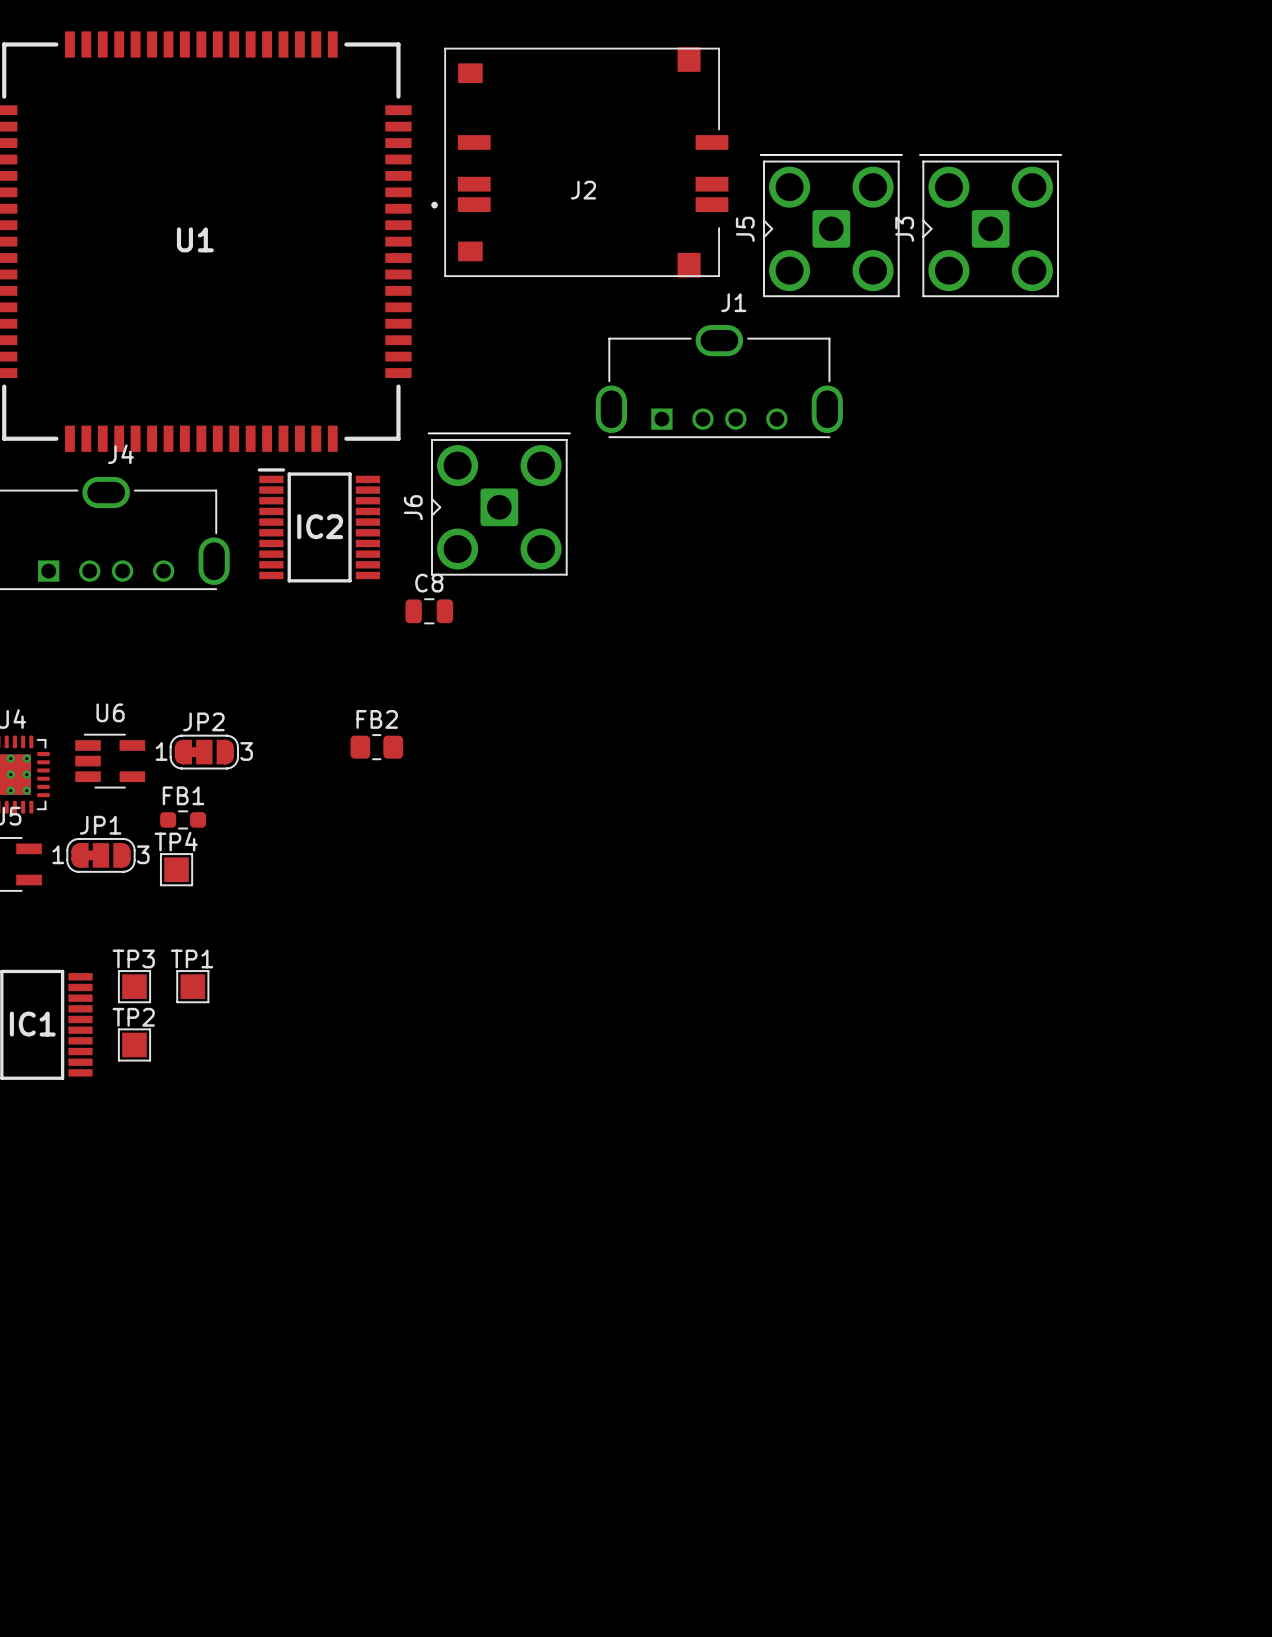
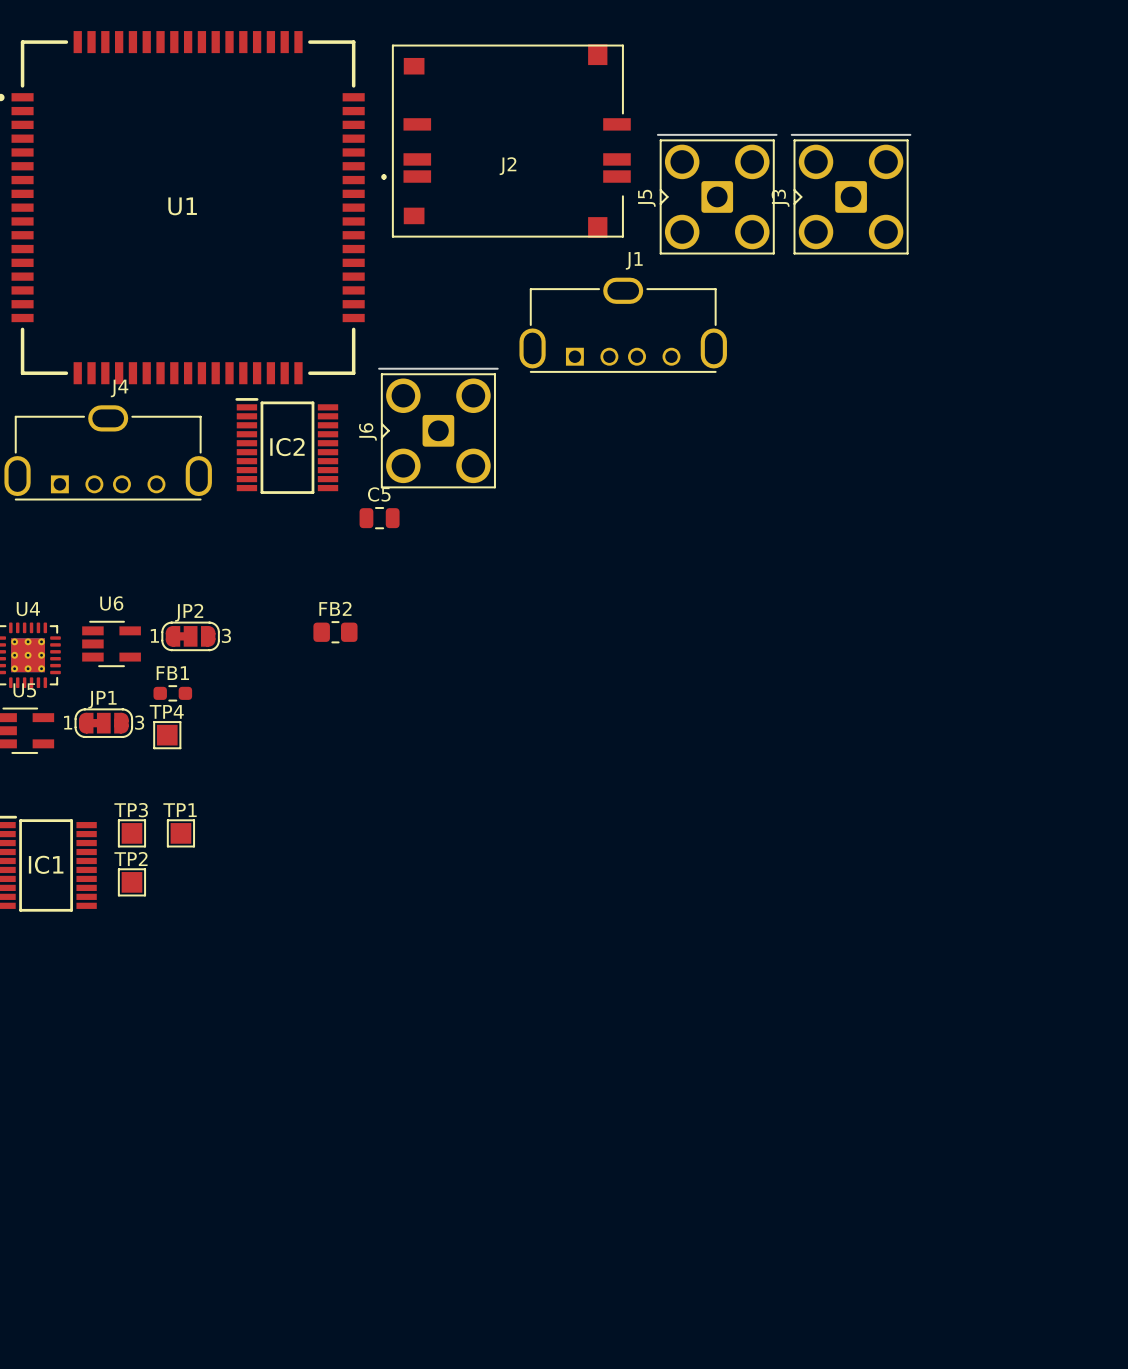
C8 name: C8 (429, 583) -> C5 (379, 494)

